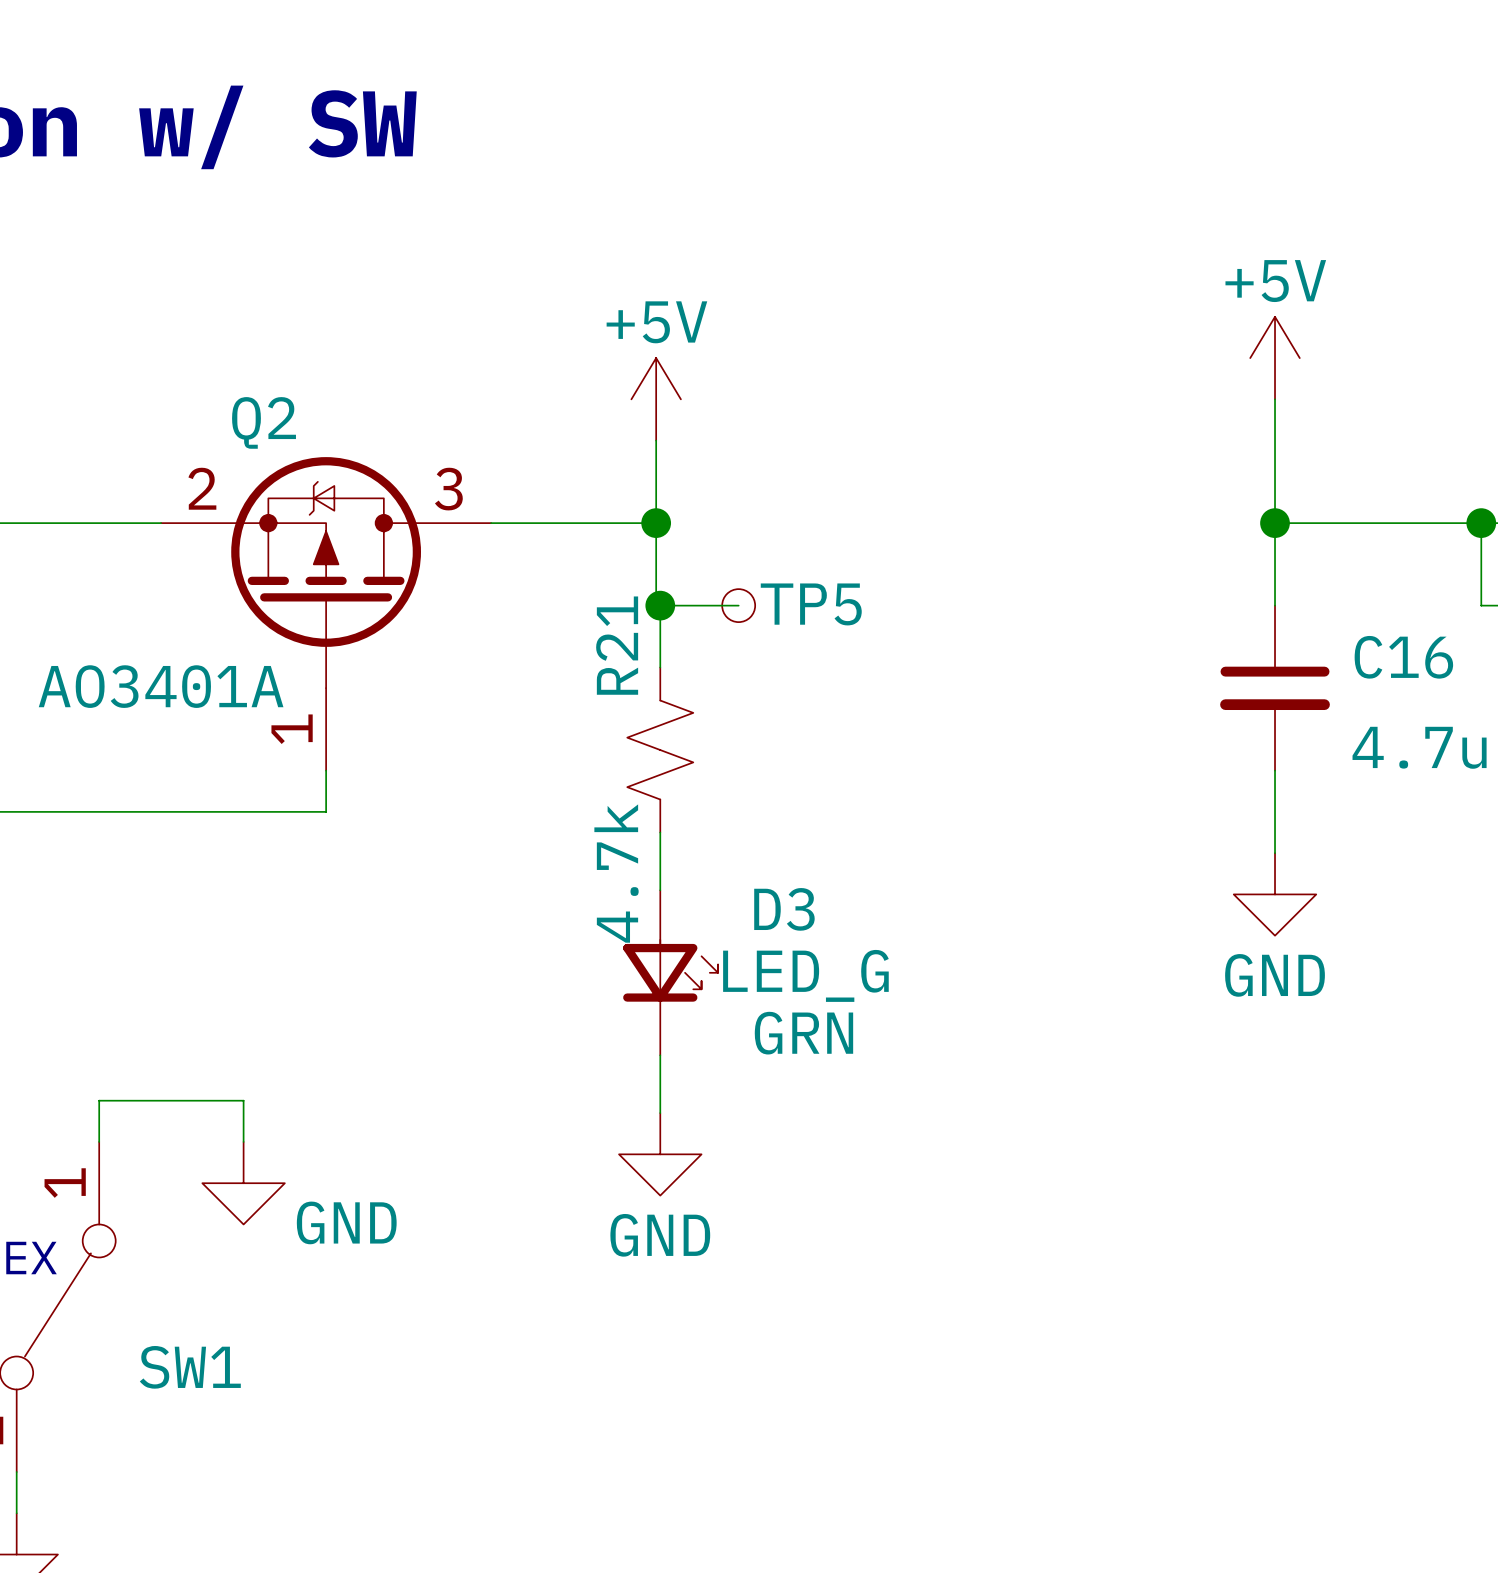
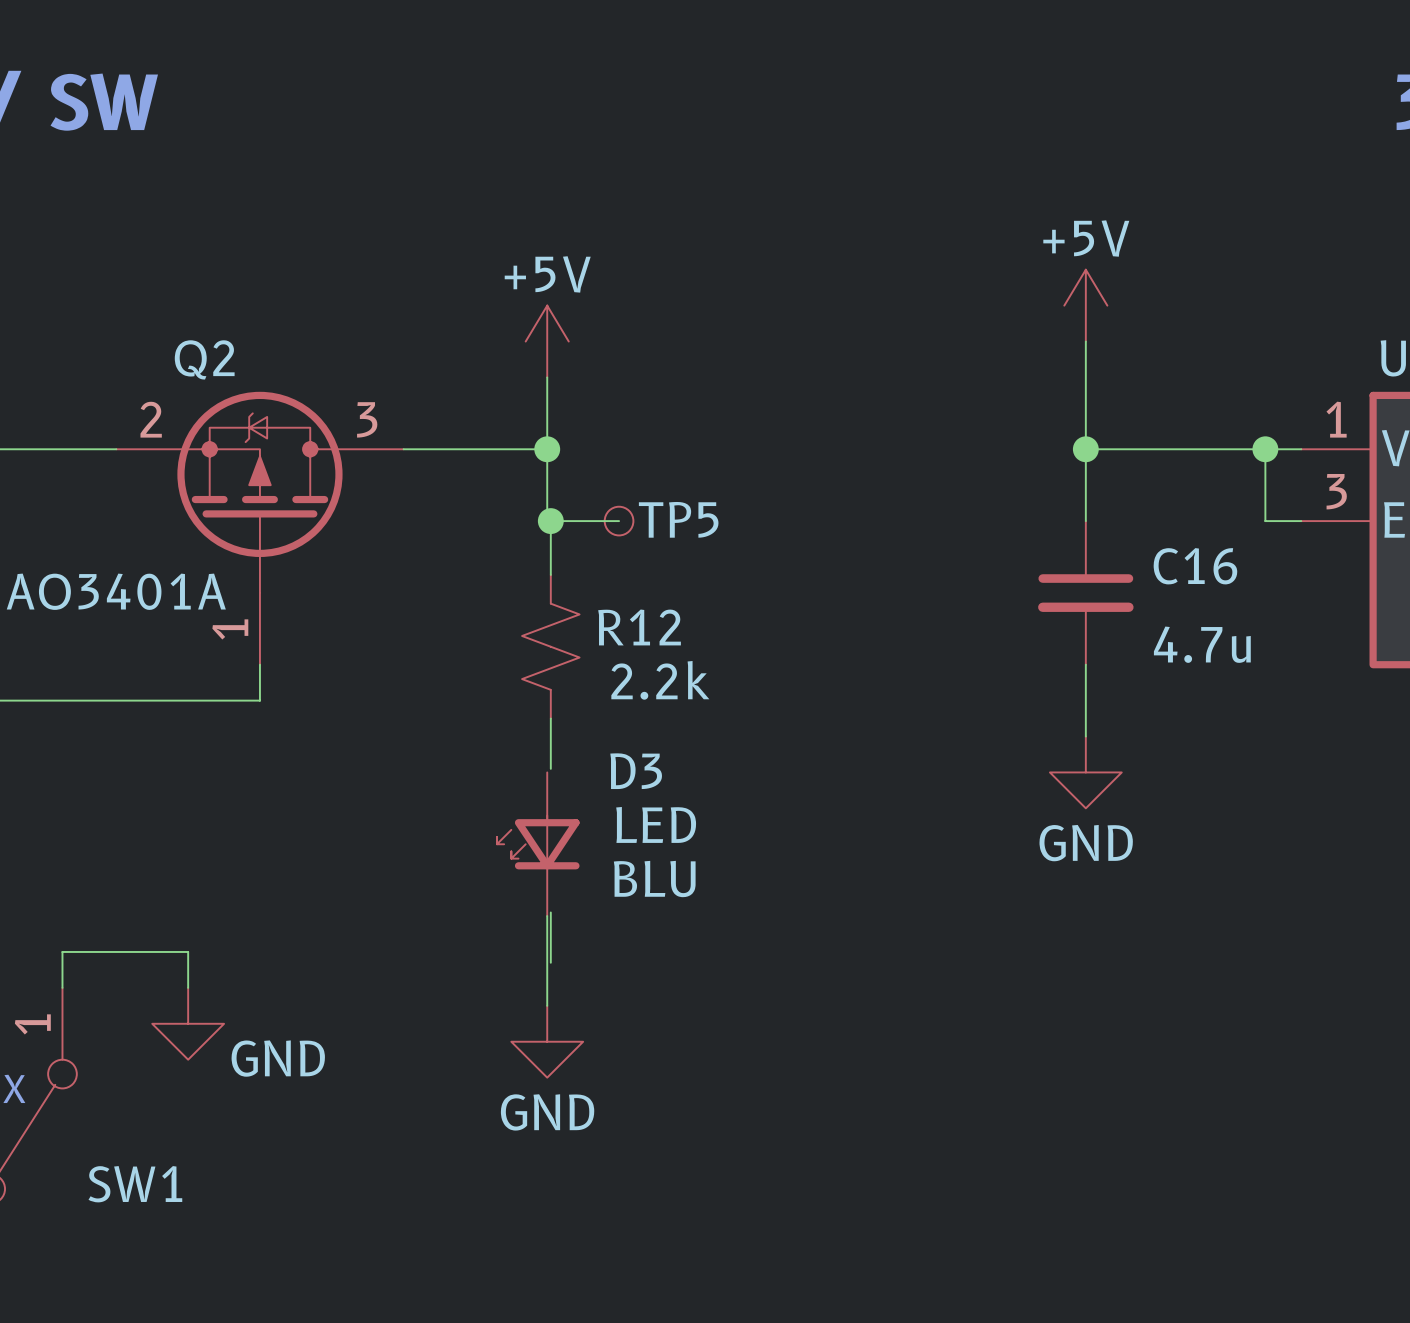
R21 name: R21 (617, 645) -> R12 (639, 627)
R21 value: 4.7k (616, 873) -> 2.2k (660, 680)
D3 flip: as is (670, 970) -> left-right (538, 842)
D3 value: LED_G (805, 975) -> LED (656, 824)
D3 text: GRN (803, 1033) -> BLU (654, 879)
wire: none -> (547, 916) (547, 1005)
power symbol position: GND (660, 1154) -> GND (547, 1041)

